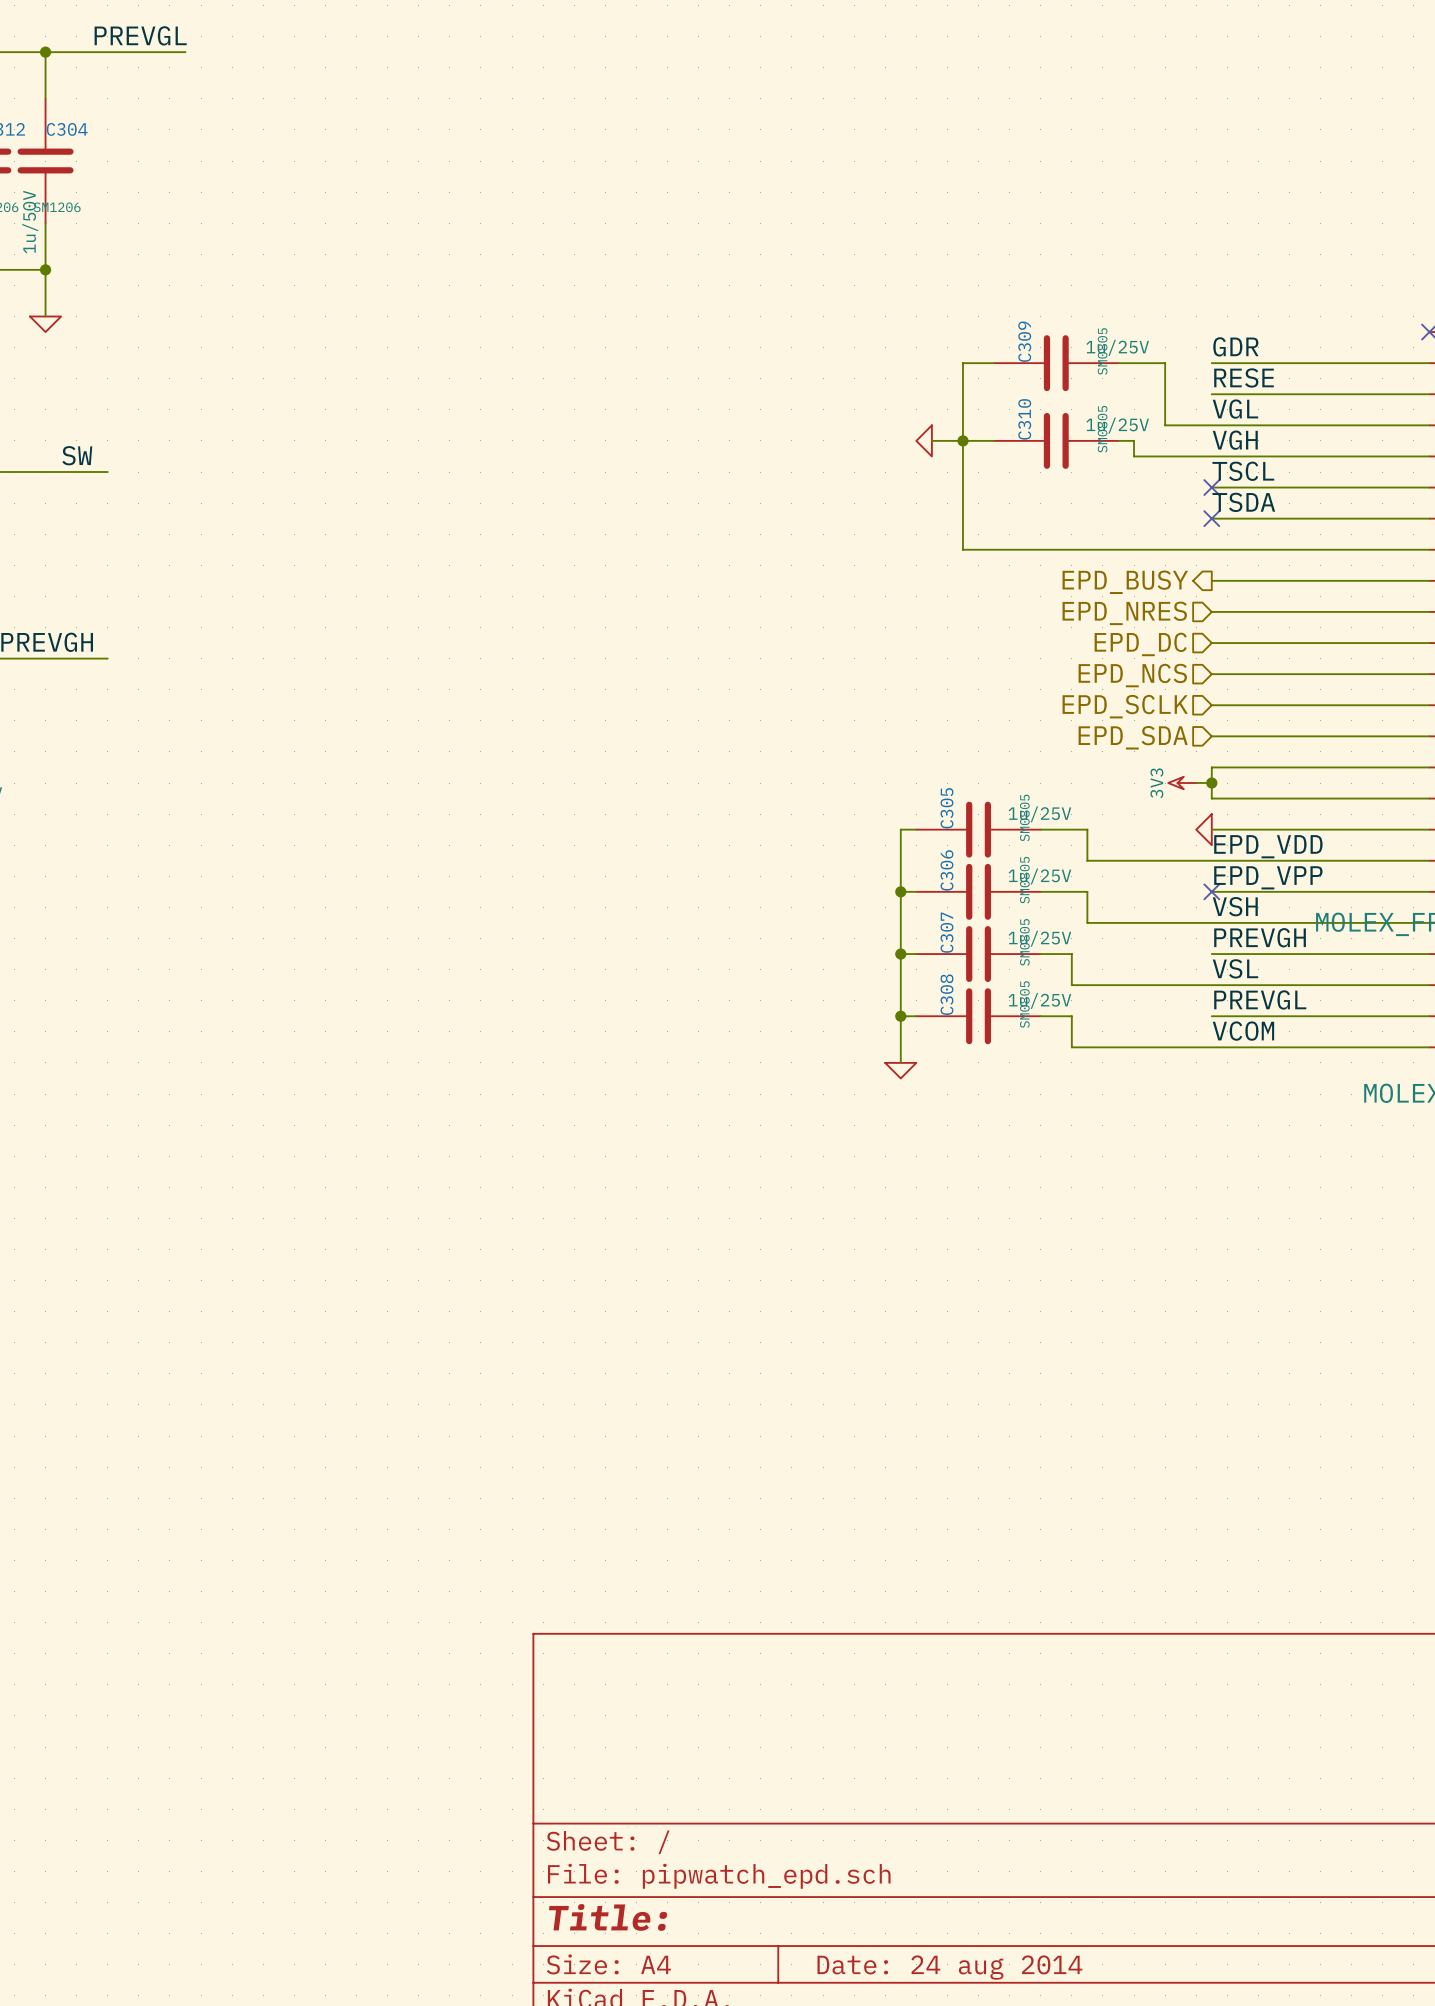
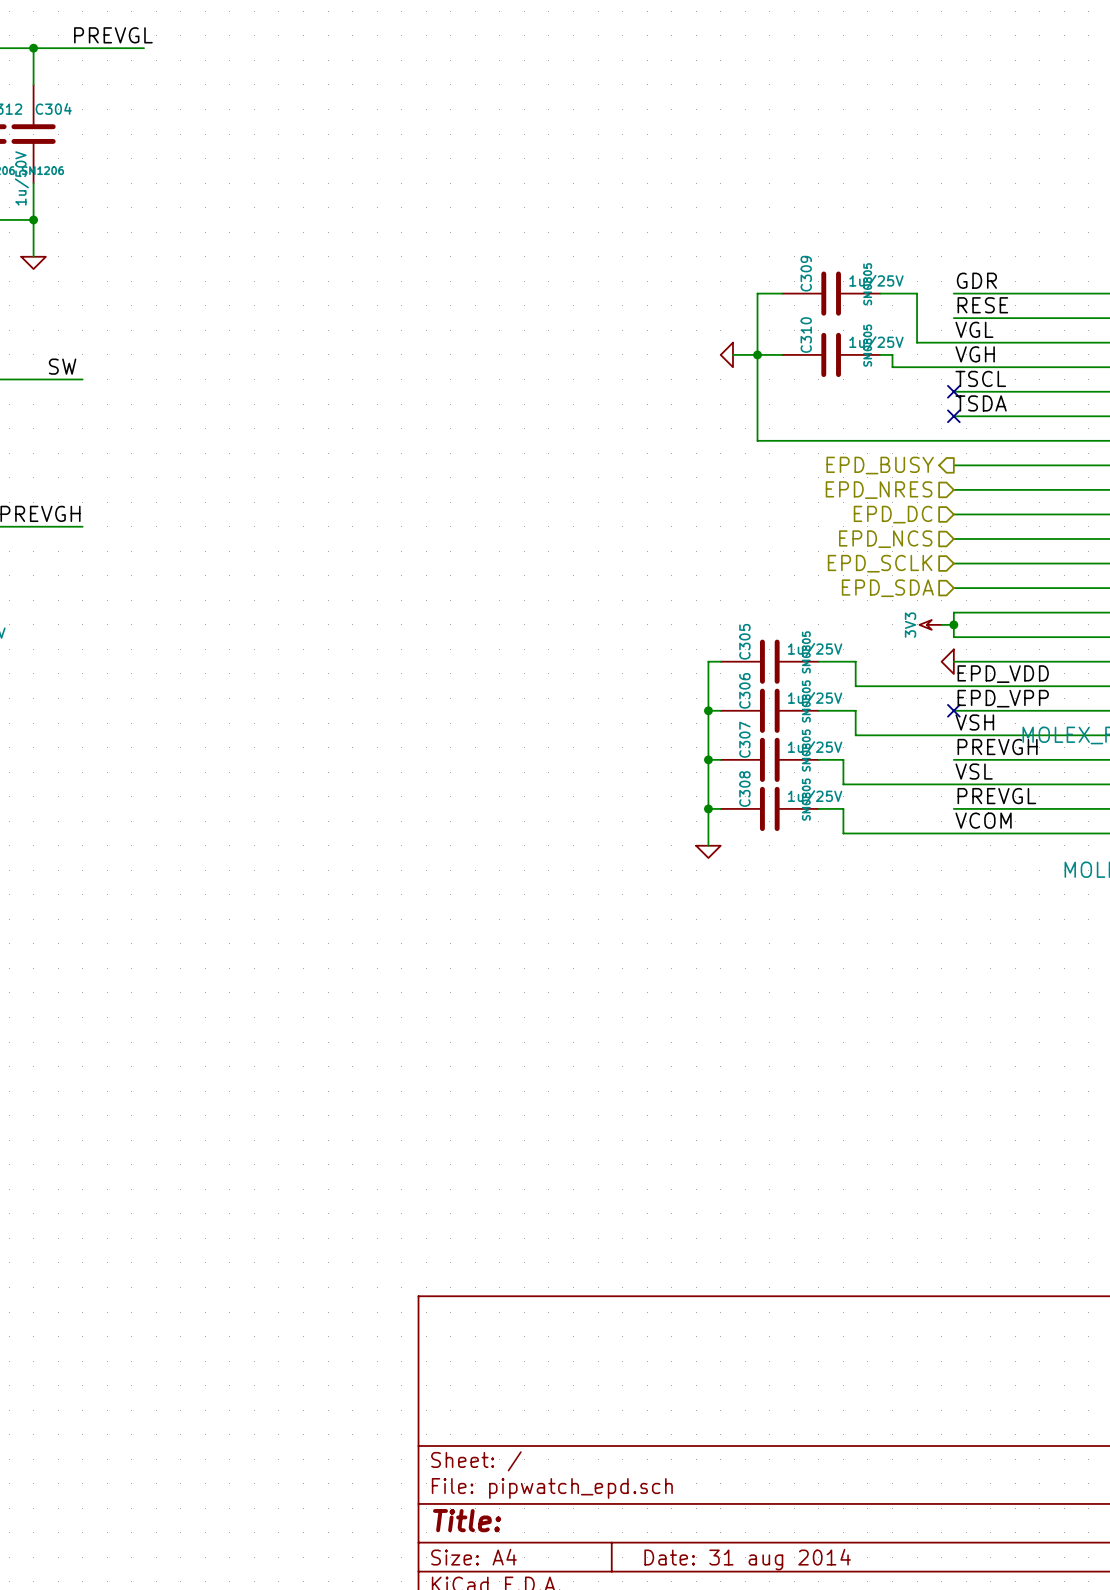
title block: Date: 24 aug 2014 (949, 1967) -> Date: 31 aug 2014 (747, 1559)

